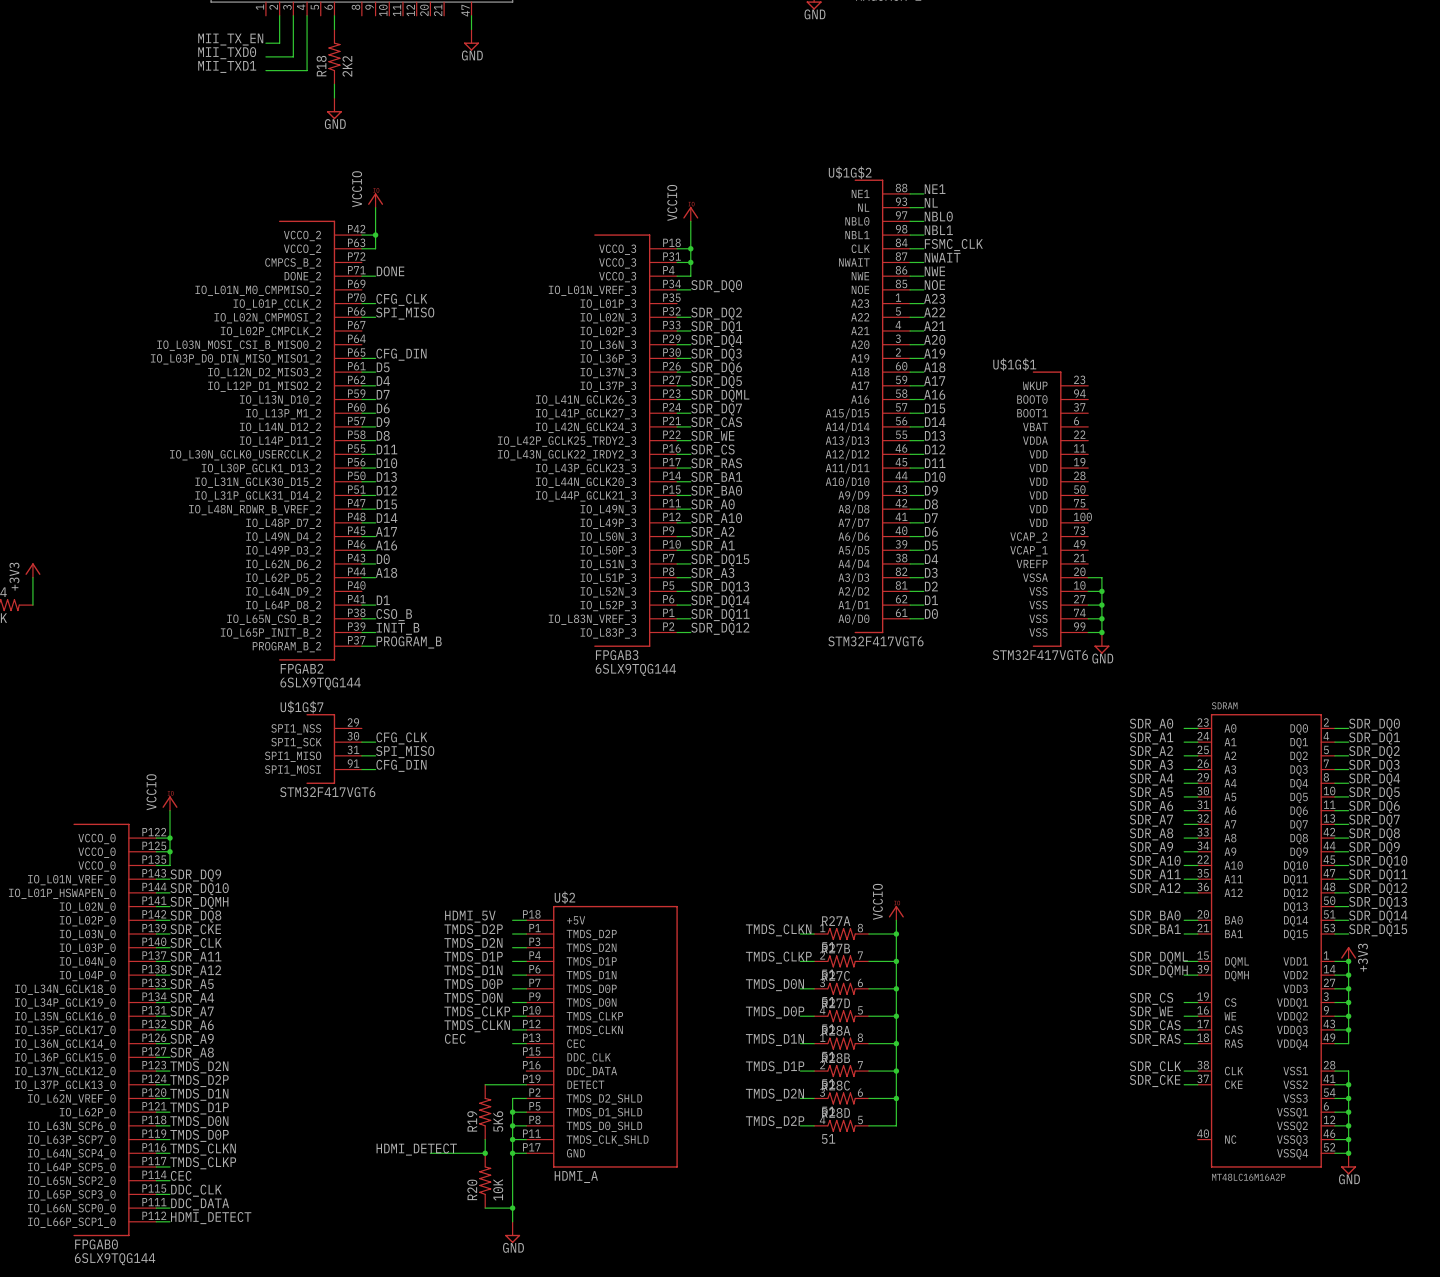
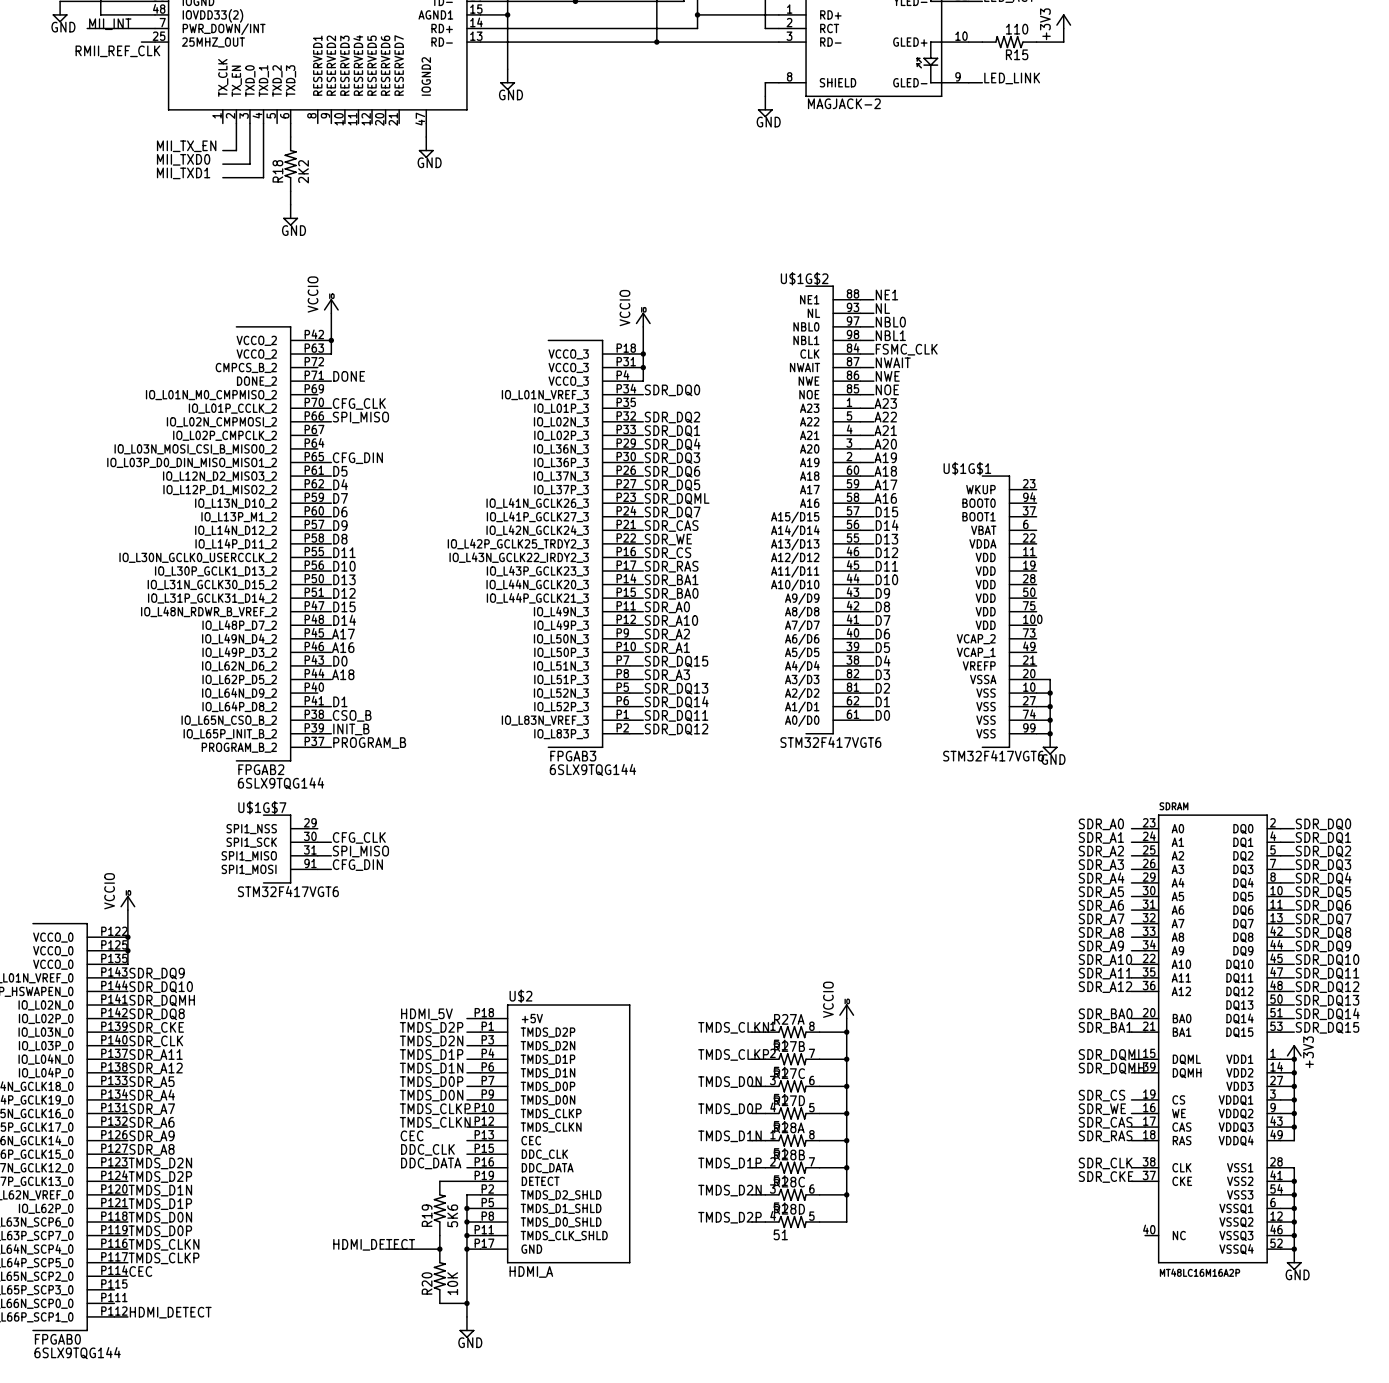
label: none -> DDC_CLK (427, 1149)
wire: none -> (466, 1154) (480, 1154)
label: none -> DDC_DATA (431, 1163)
wire: none -> (466, 1167) (480, 1167)
label: DDC_CLK (196, 1190) -> none
wire: (156, 1194) (170, 1194) -> none
label: DDC_DATA (200, 1204) -> none
wire: (156, 1208) (170, 1208) -> none

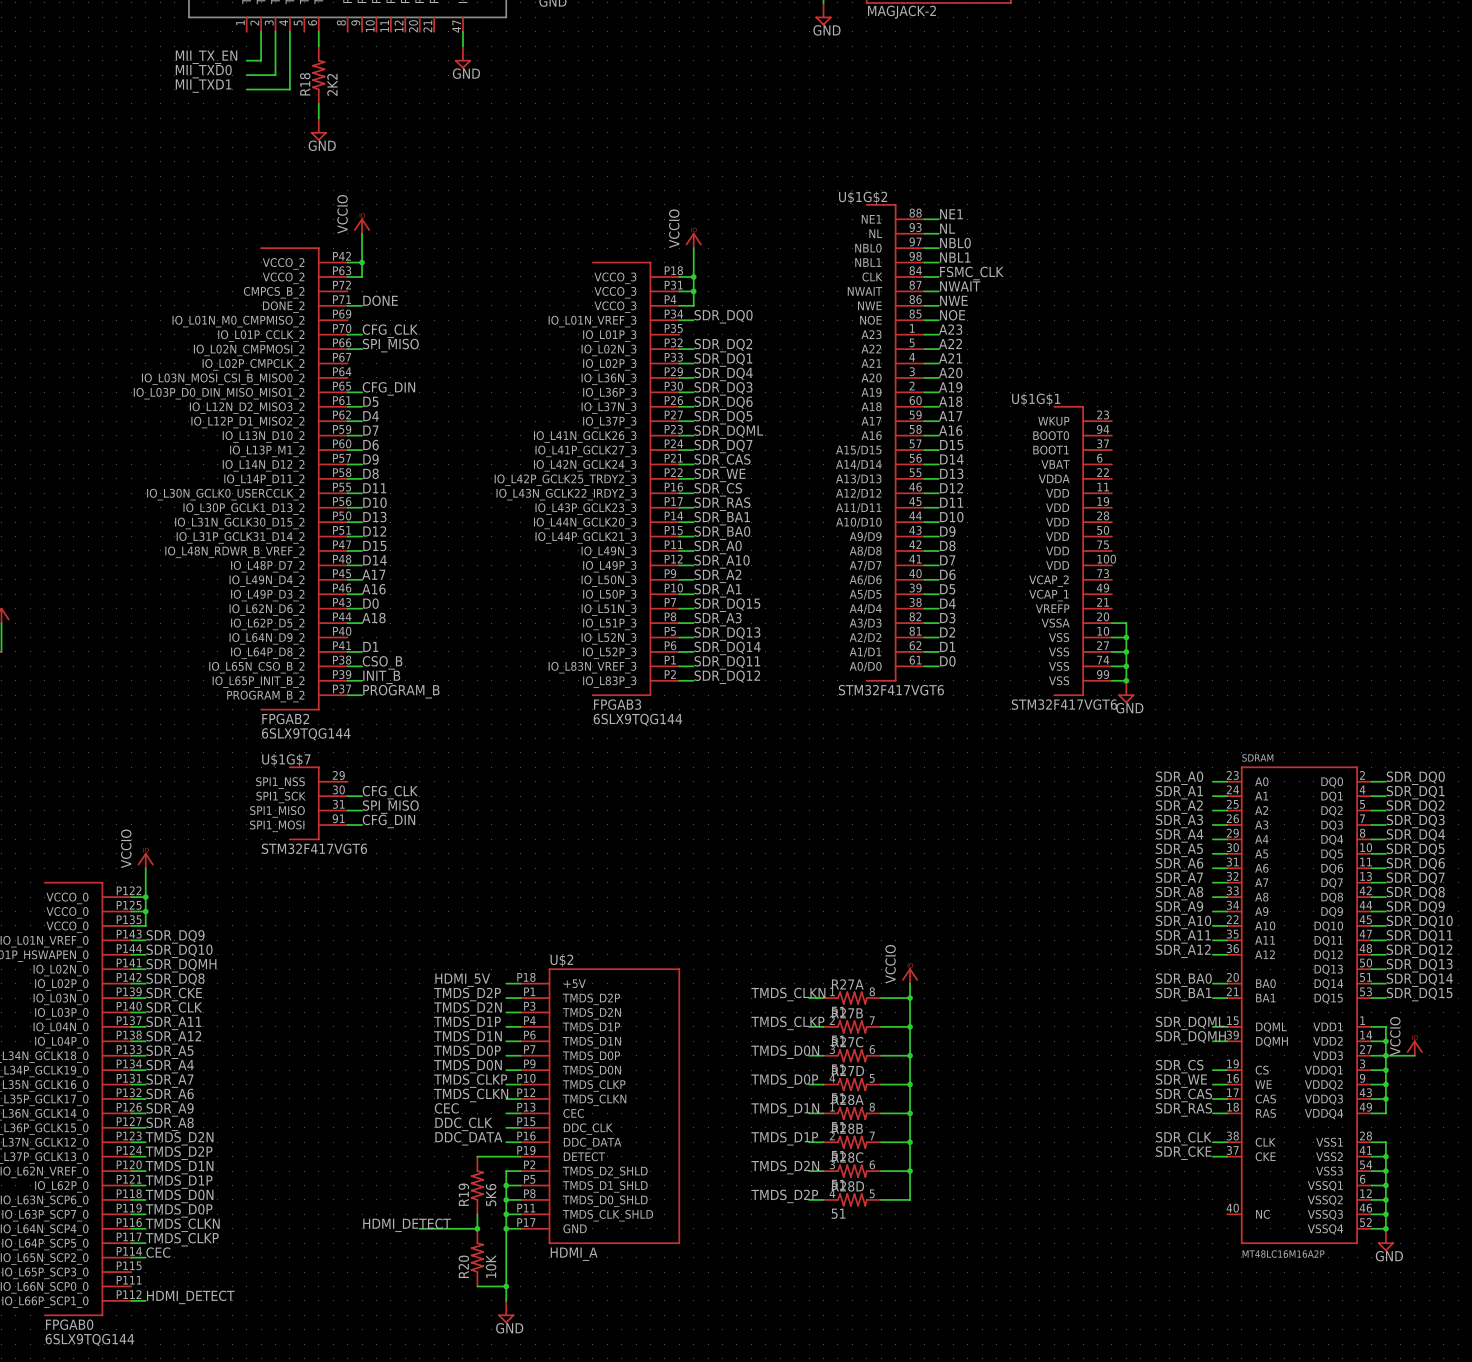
power symbol: +3V3 (1294, 1052) -> none
junction: (1294, 1059) -> none
power symbol: none -> VCCIO (1414, 1048)
wire: none -> (1385, 1055) (1414, 1055)

